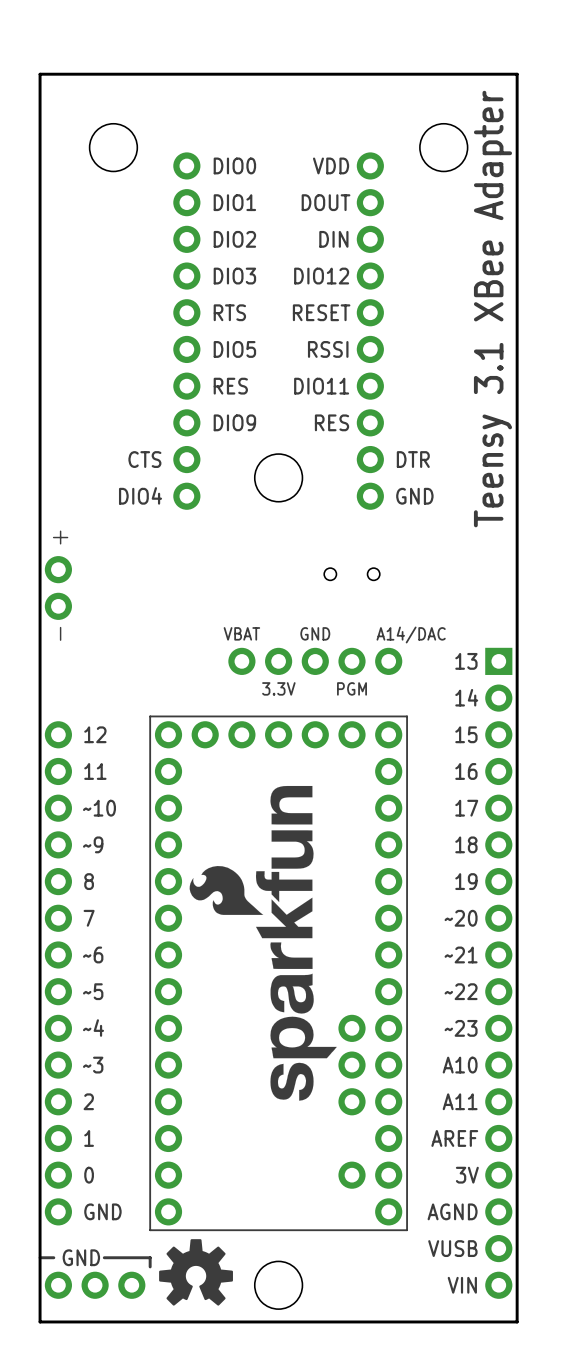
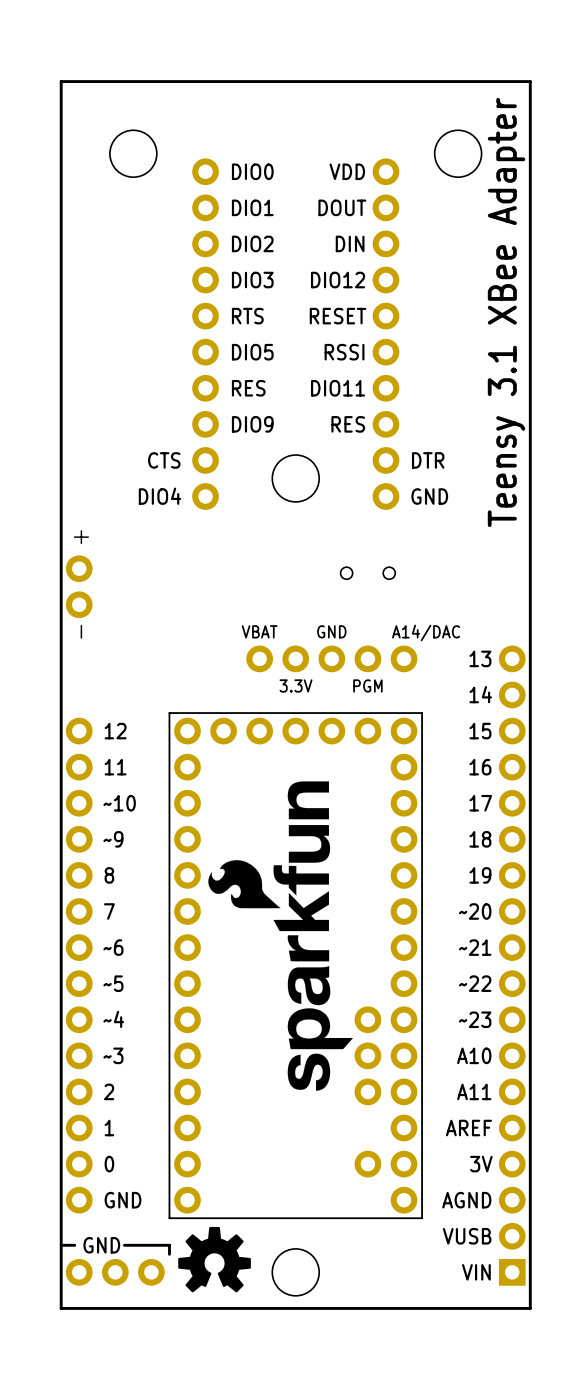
part rotation: 0° (498, 973) -> 180° (512, 965)

